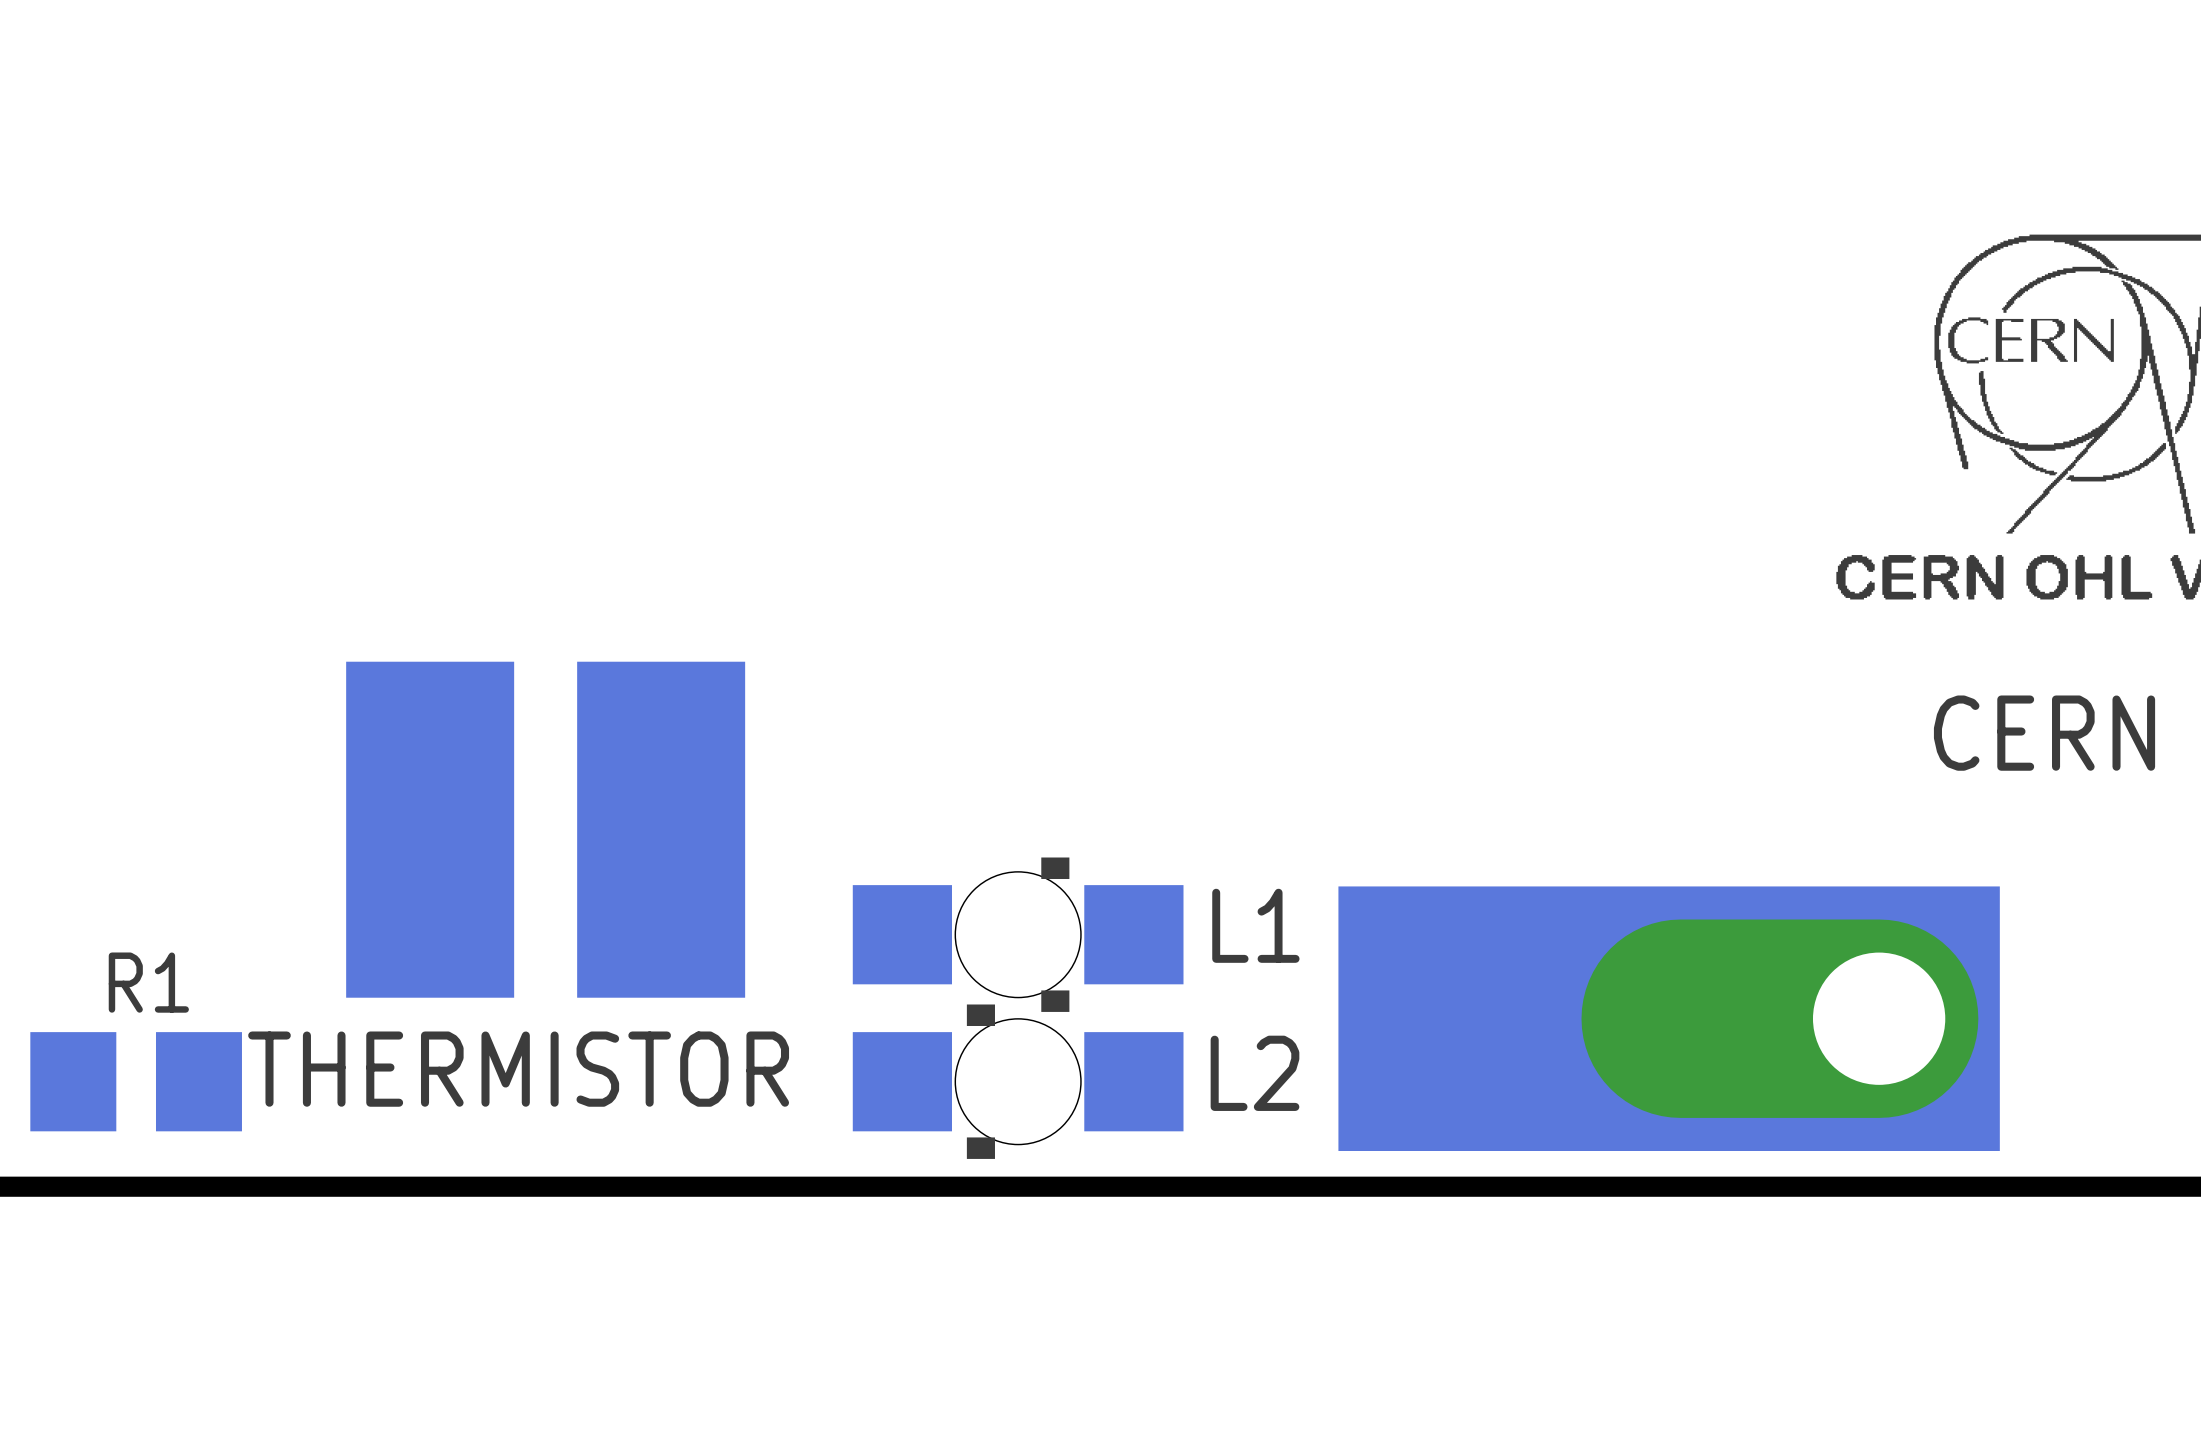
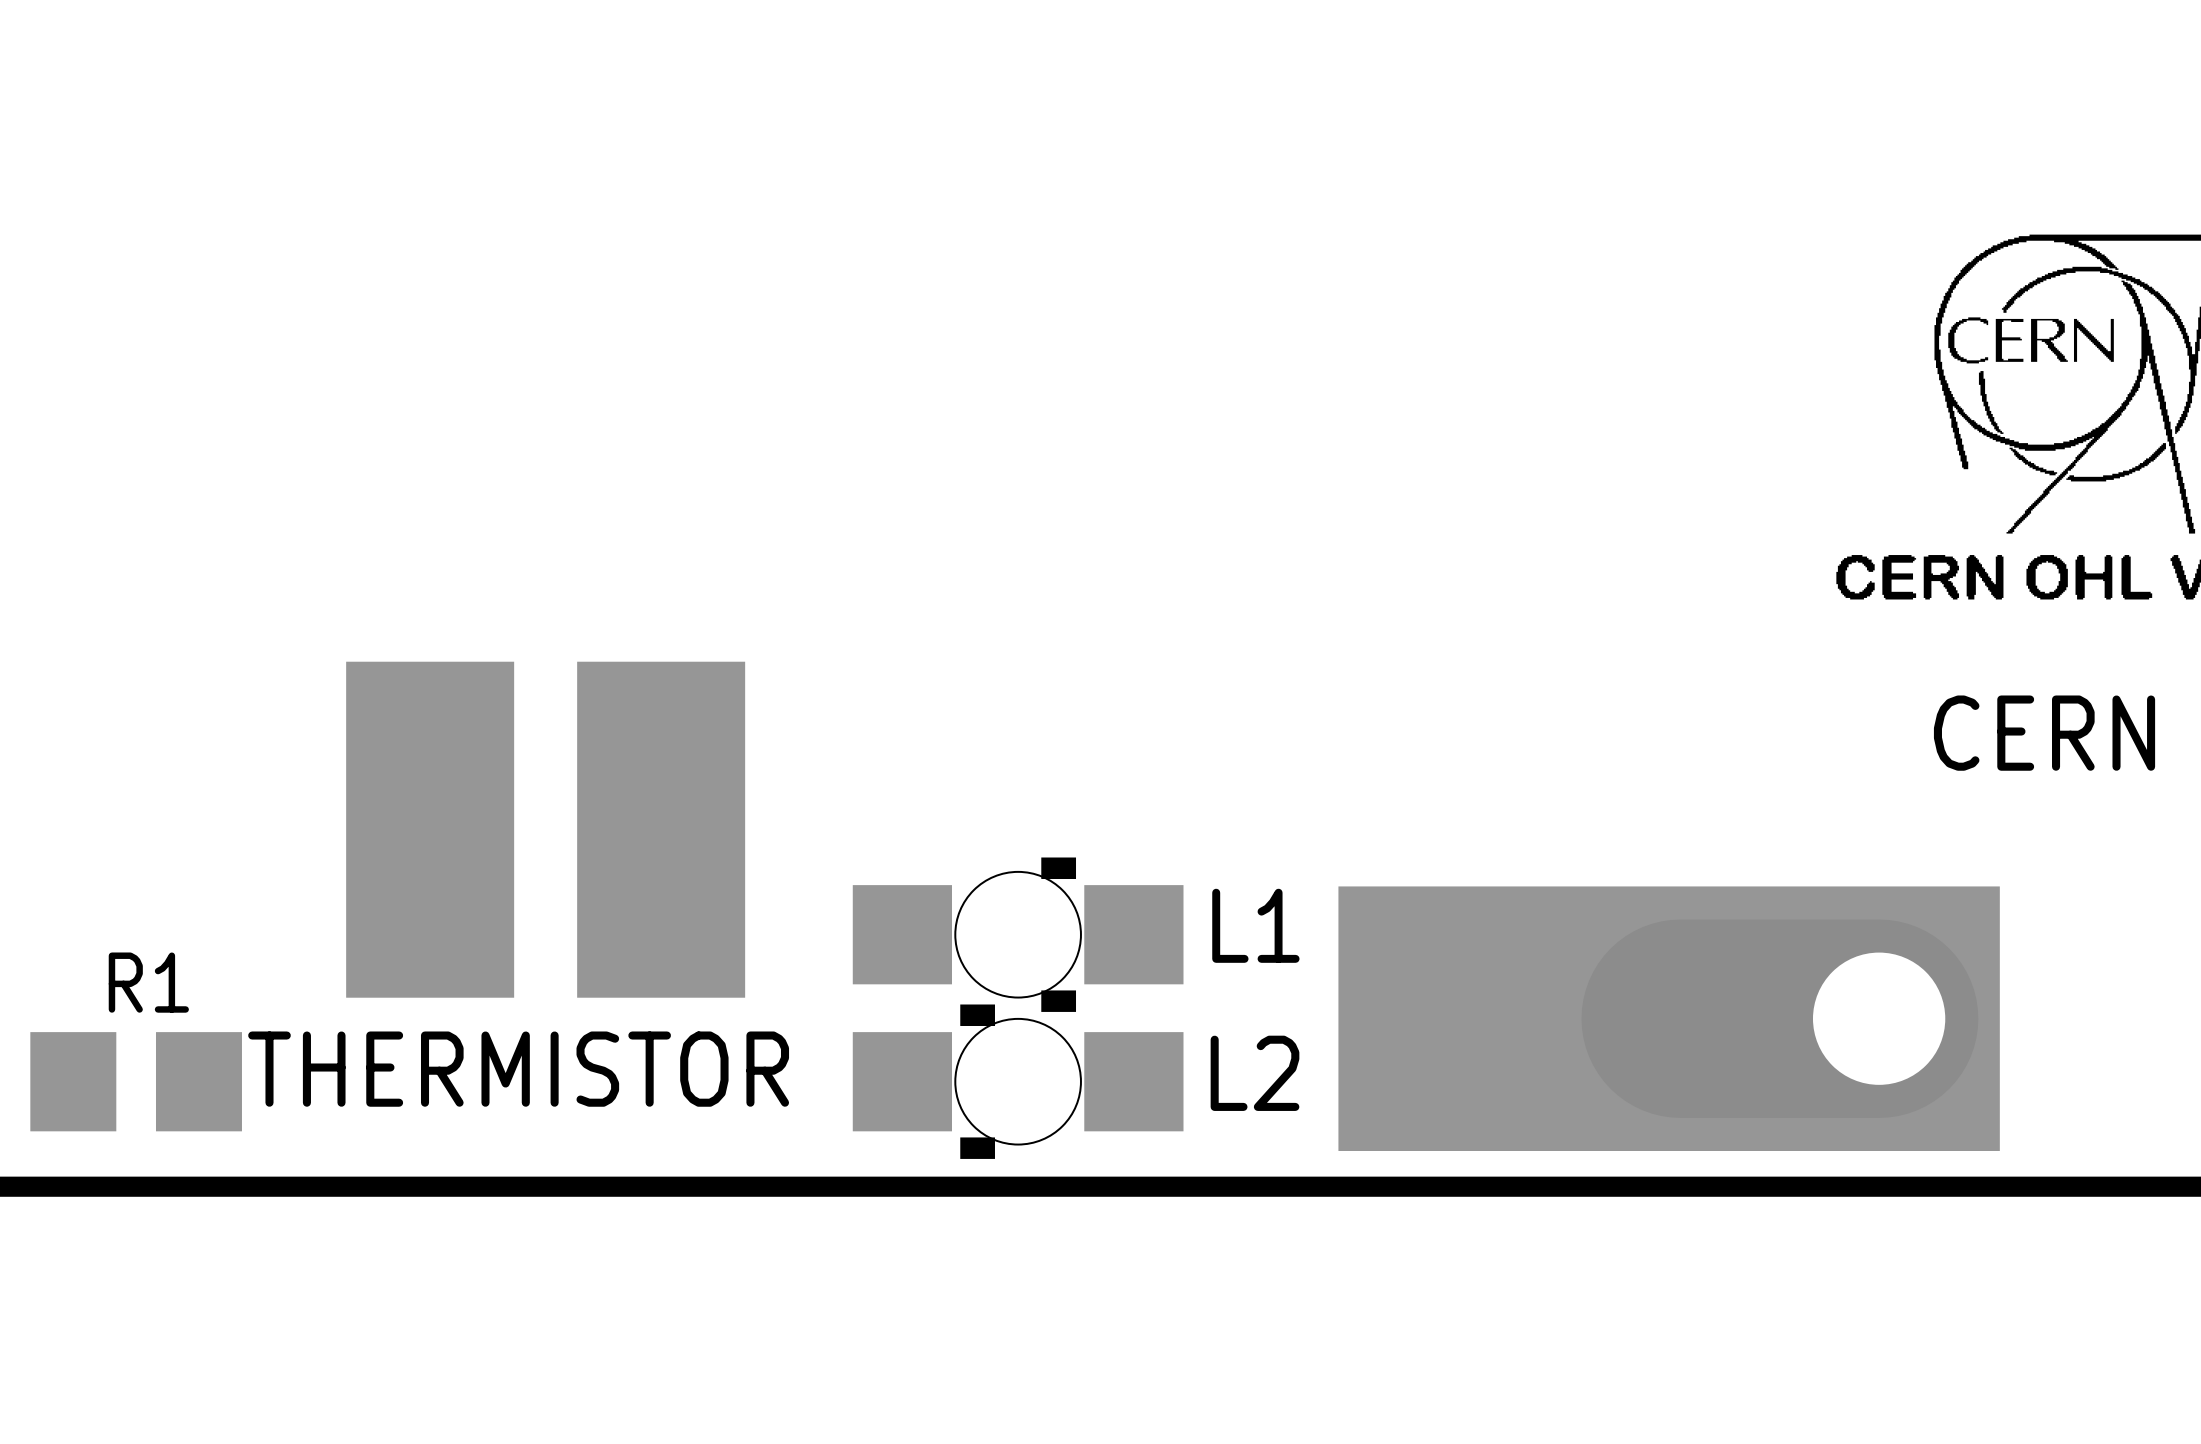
L1 footprint: [852, 857, 1184, 1012] -> [852, 857, 1184, 1012]
L2 footprint: [852, 1004, 1184, 1159] -> [852, 1004, 1184, 1159]

